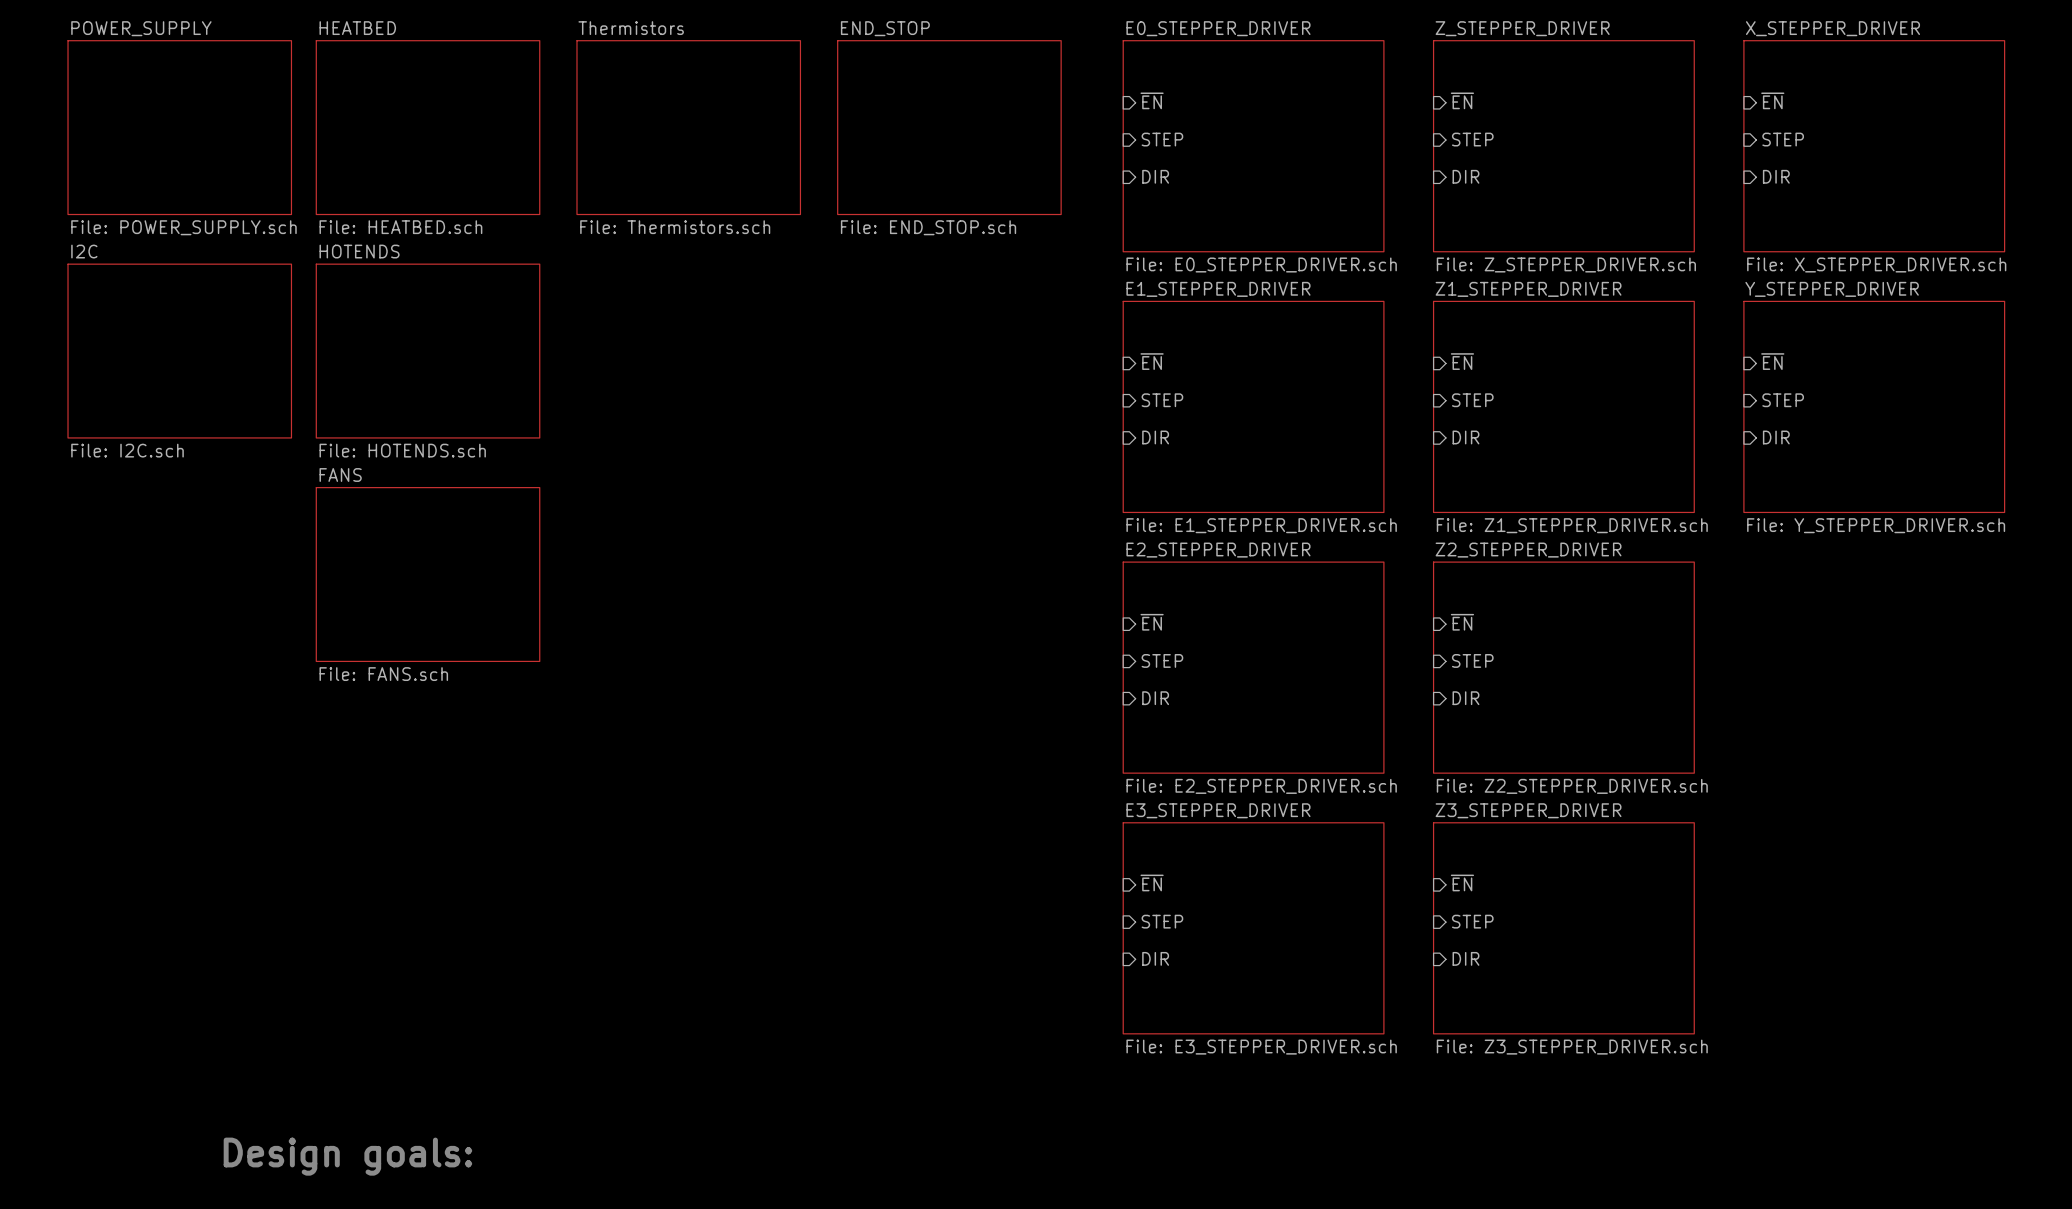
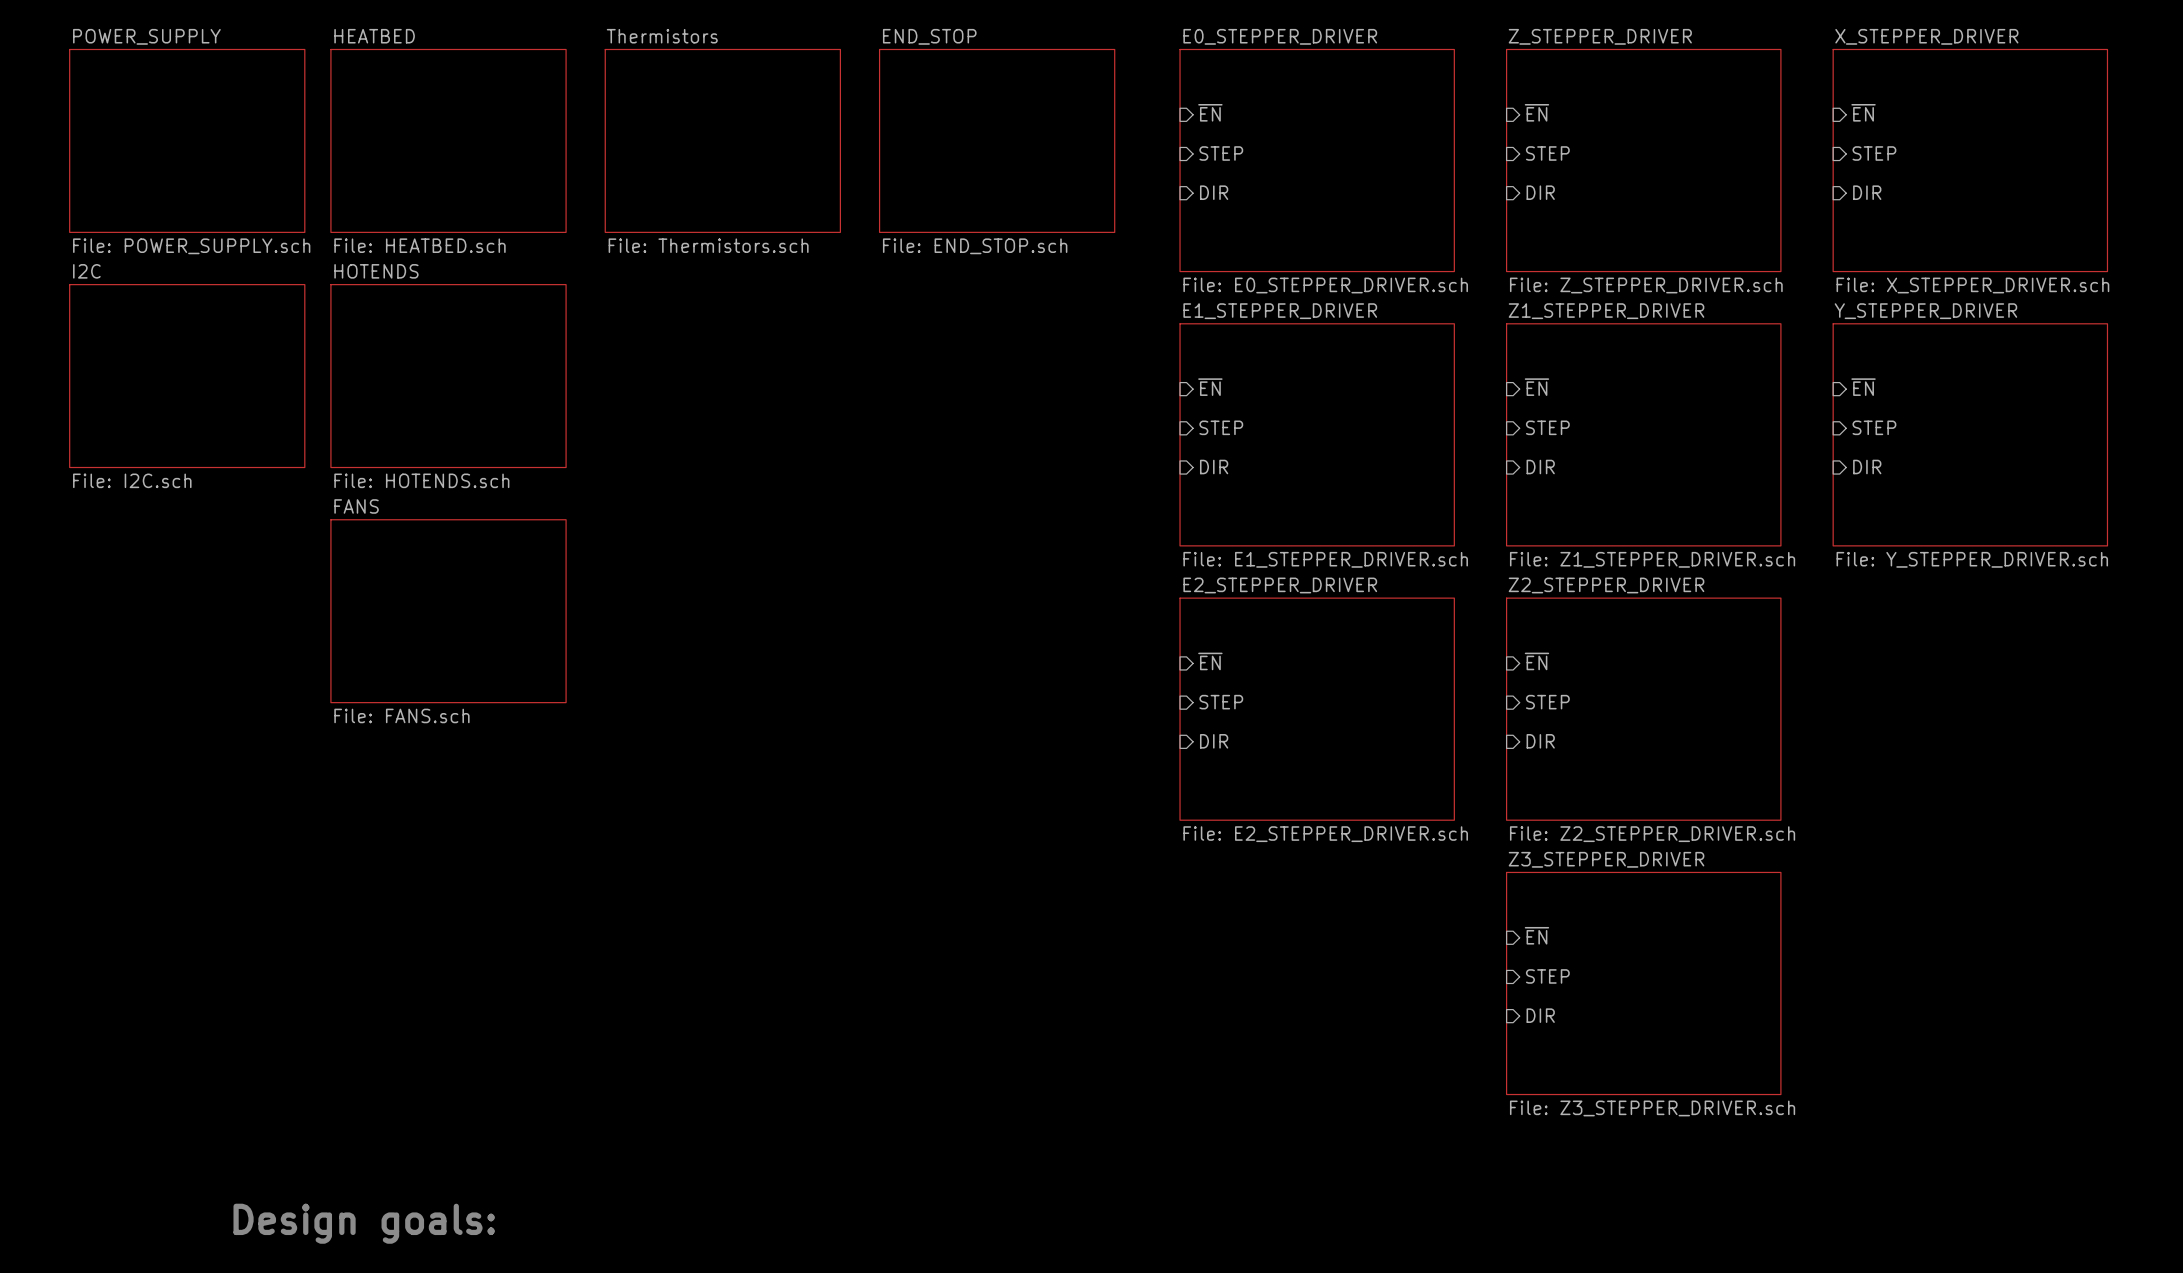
sheet pin: ~{EN} (1152, 882) -> none
sheet pin: STEP (1162, 921) -> none
sheet E3_STEPPER_DRIVER: File: E3_STEPPER_DRIVER.sch (1253, 928) -> none
sheet pin: DIR (1155, 958) -> none

